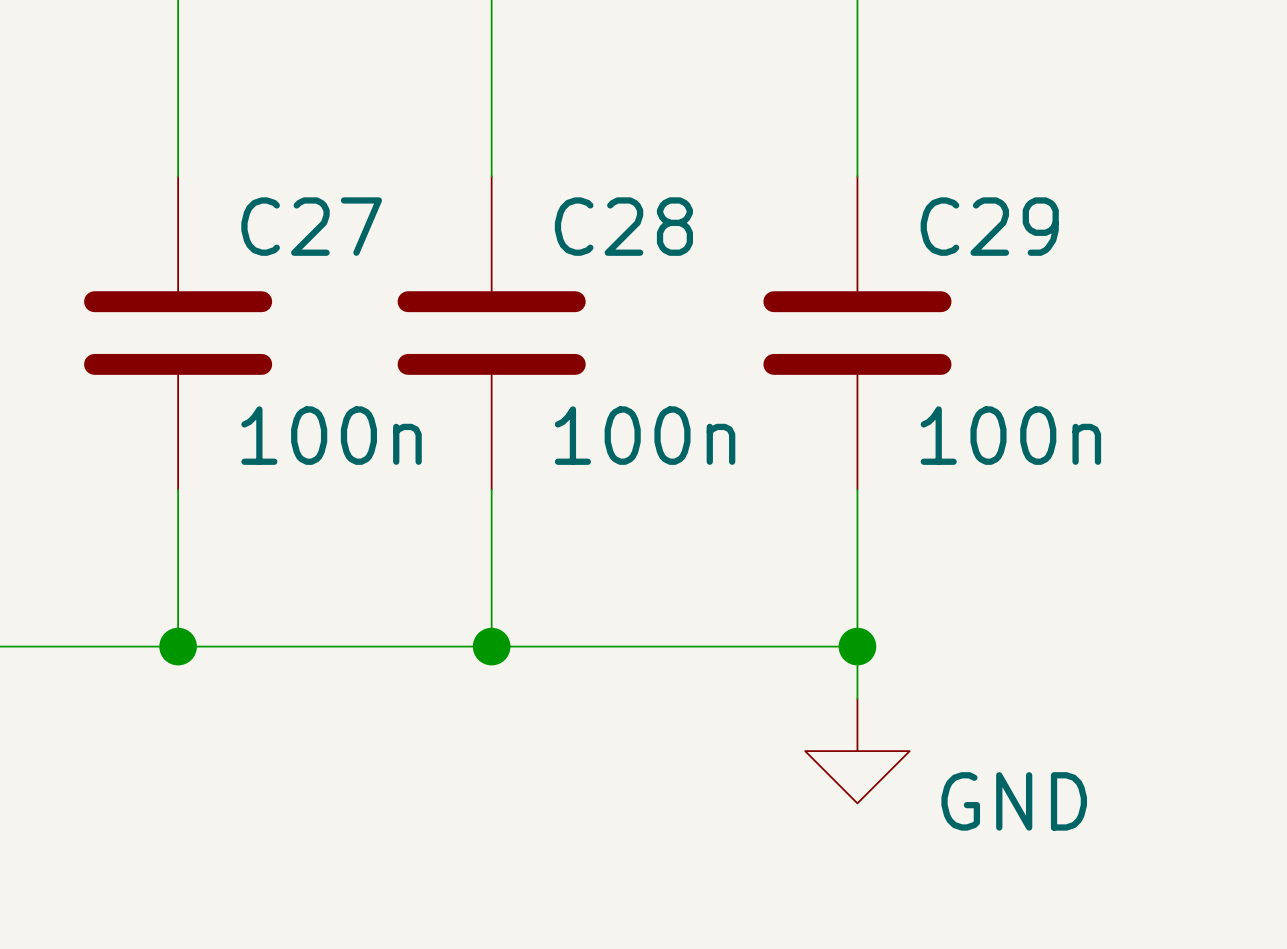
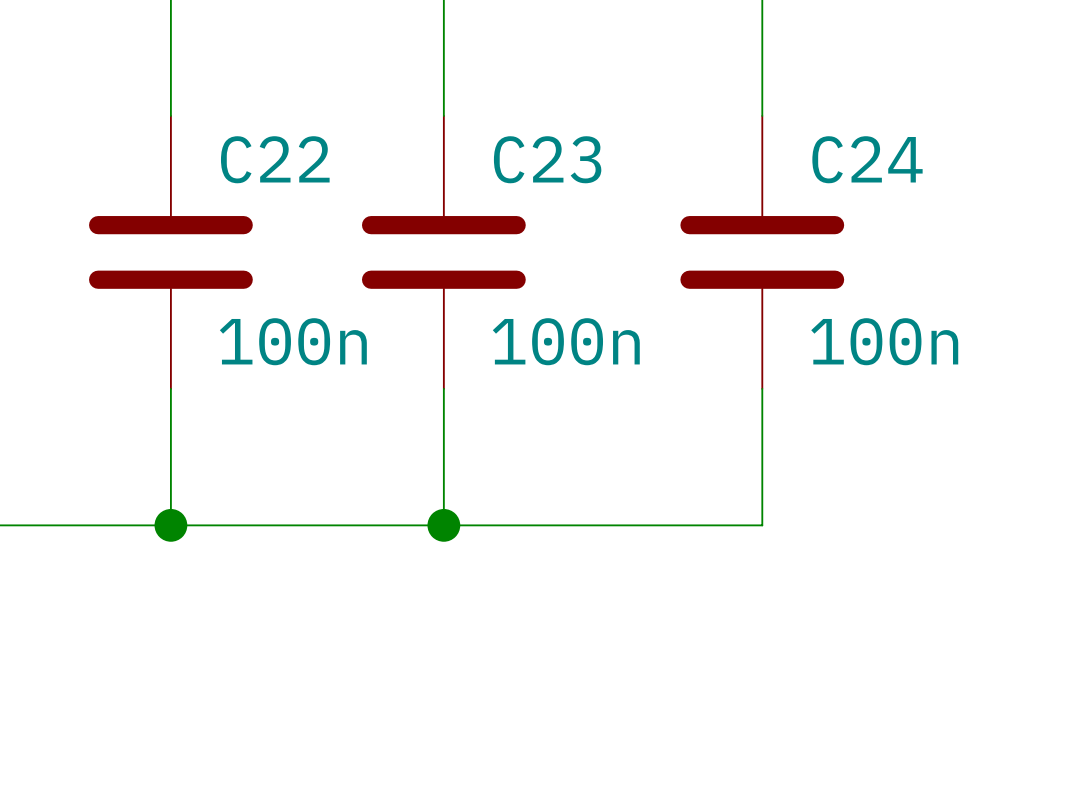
C27 name: C27 (311, 226) -> C22 (275, 159)
C28 name: C28 (623, 226) -> C23 (547, 159)
C29 name: C29 (989, 226) -> C24 (867, 159)
wire: (857, 646) (857, 698) -> none
junction: (857, 646) -> none
power symbol: GND (857, 751) -> none

